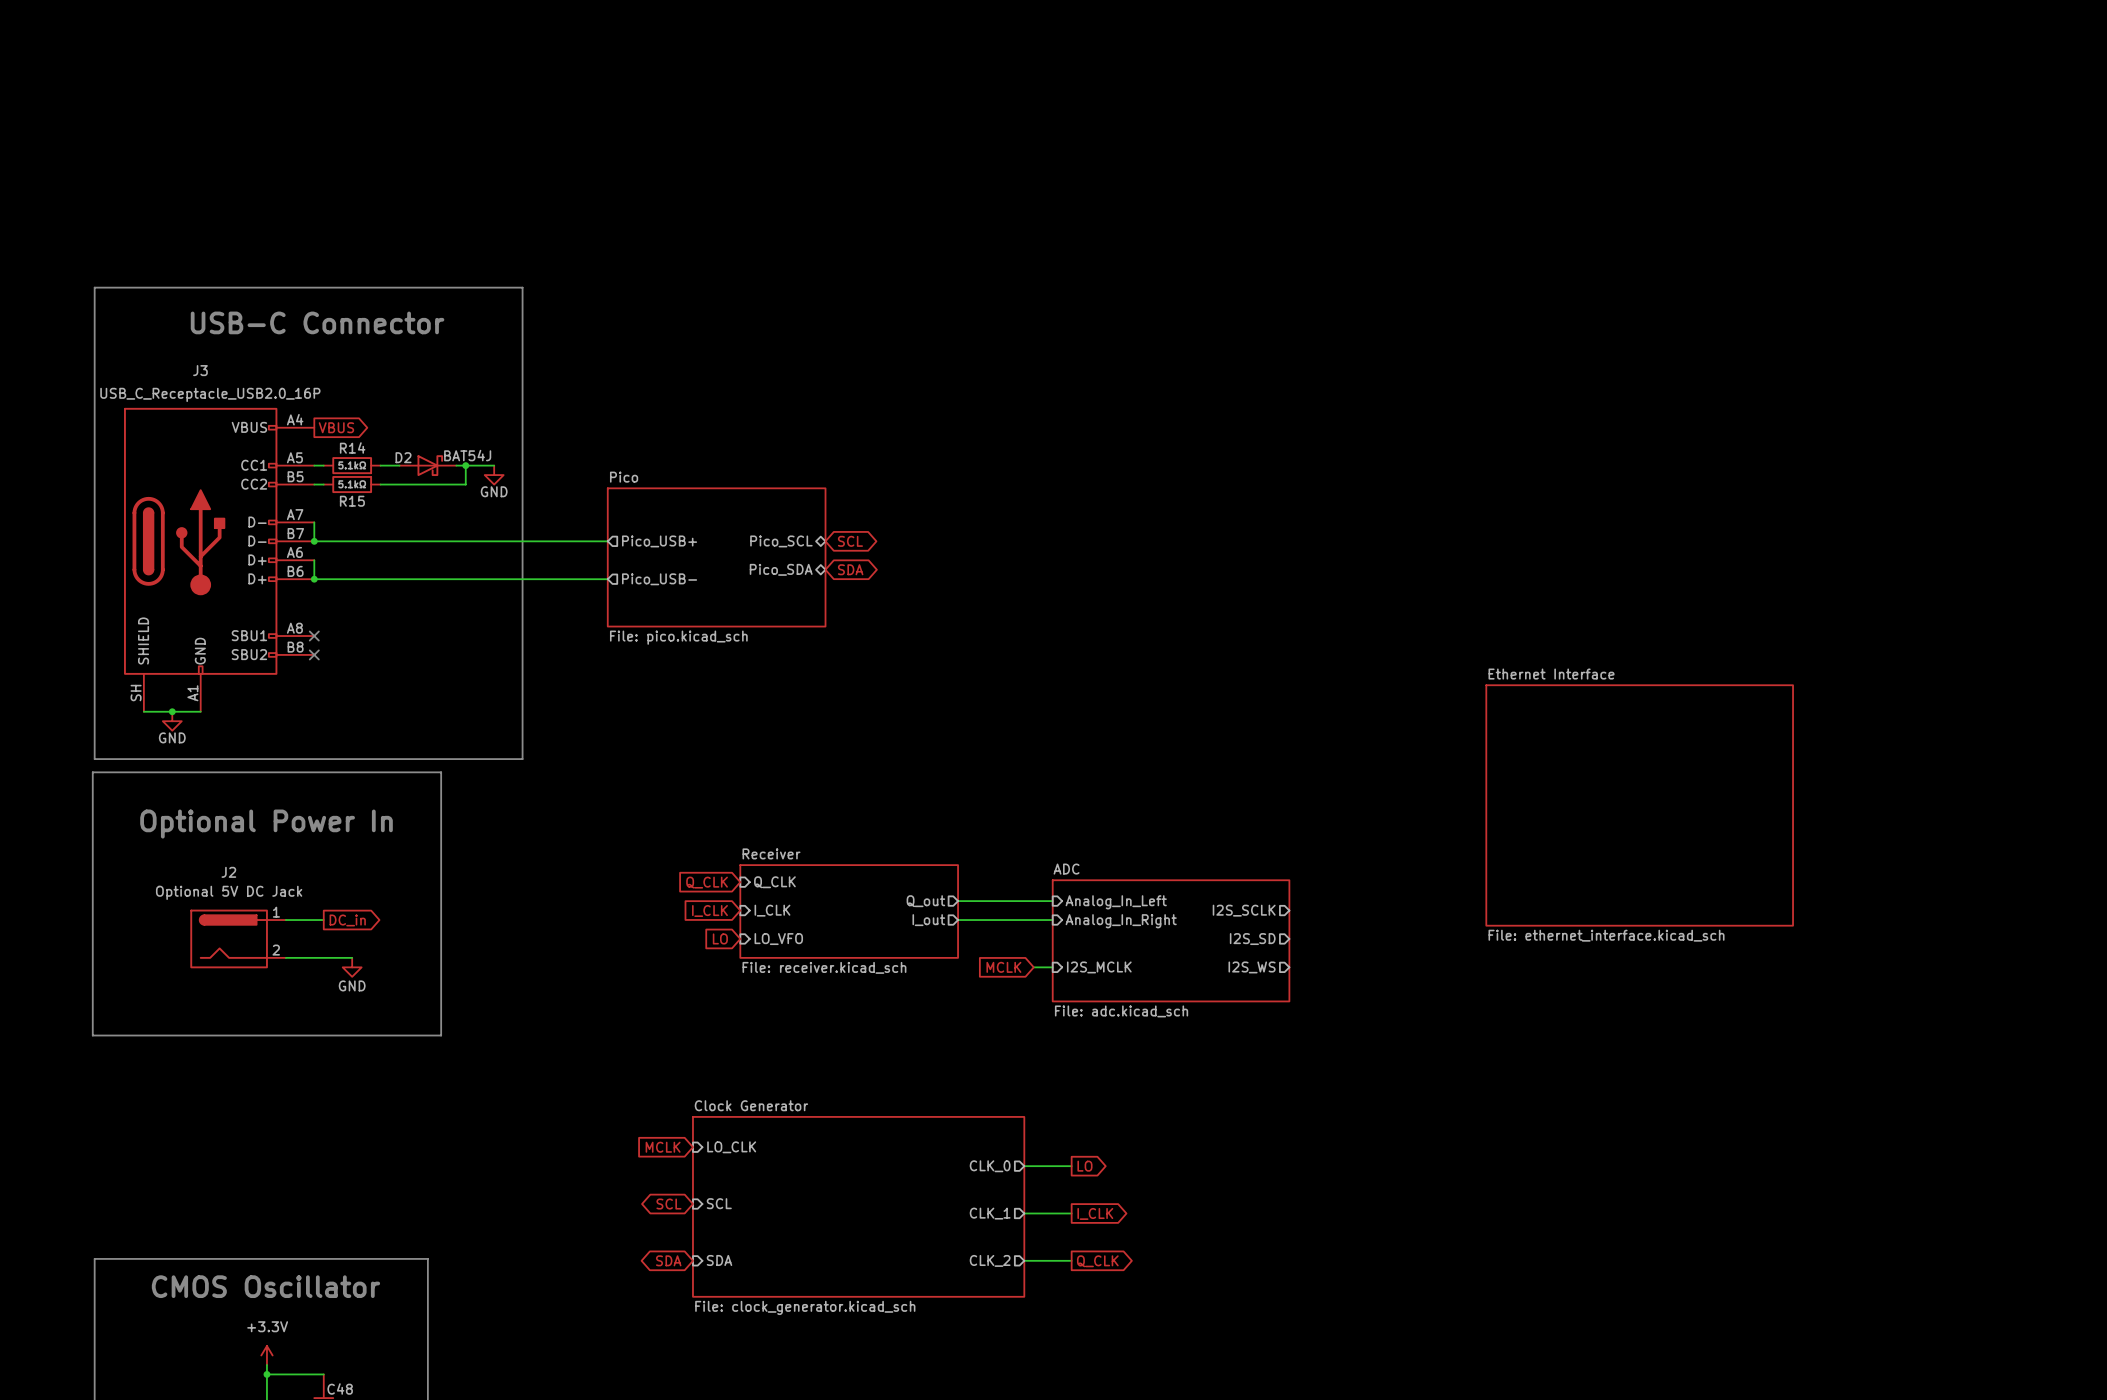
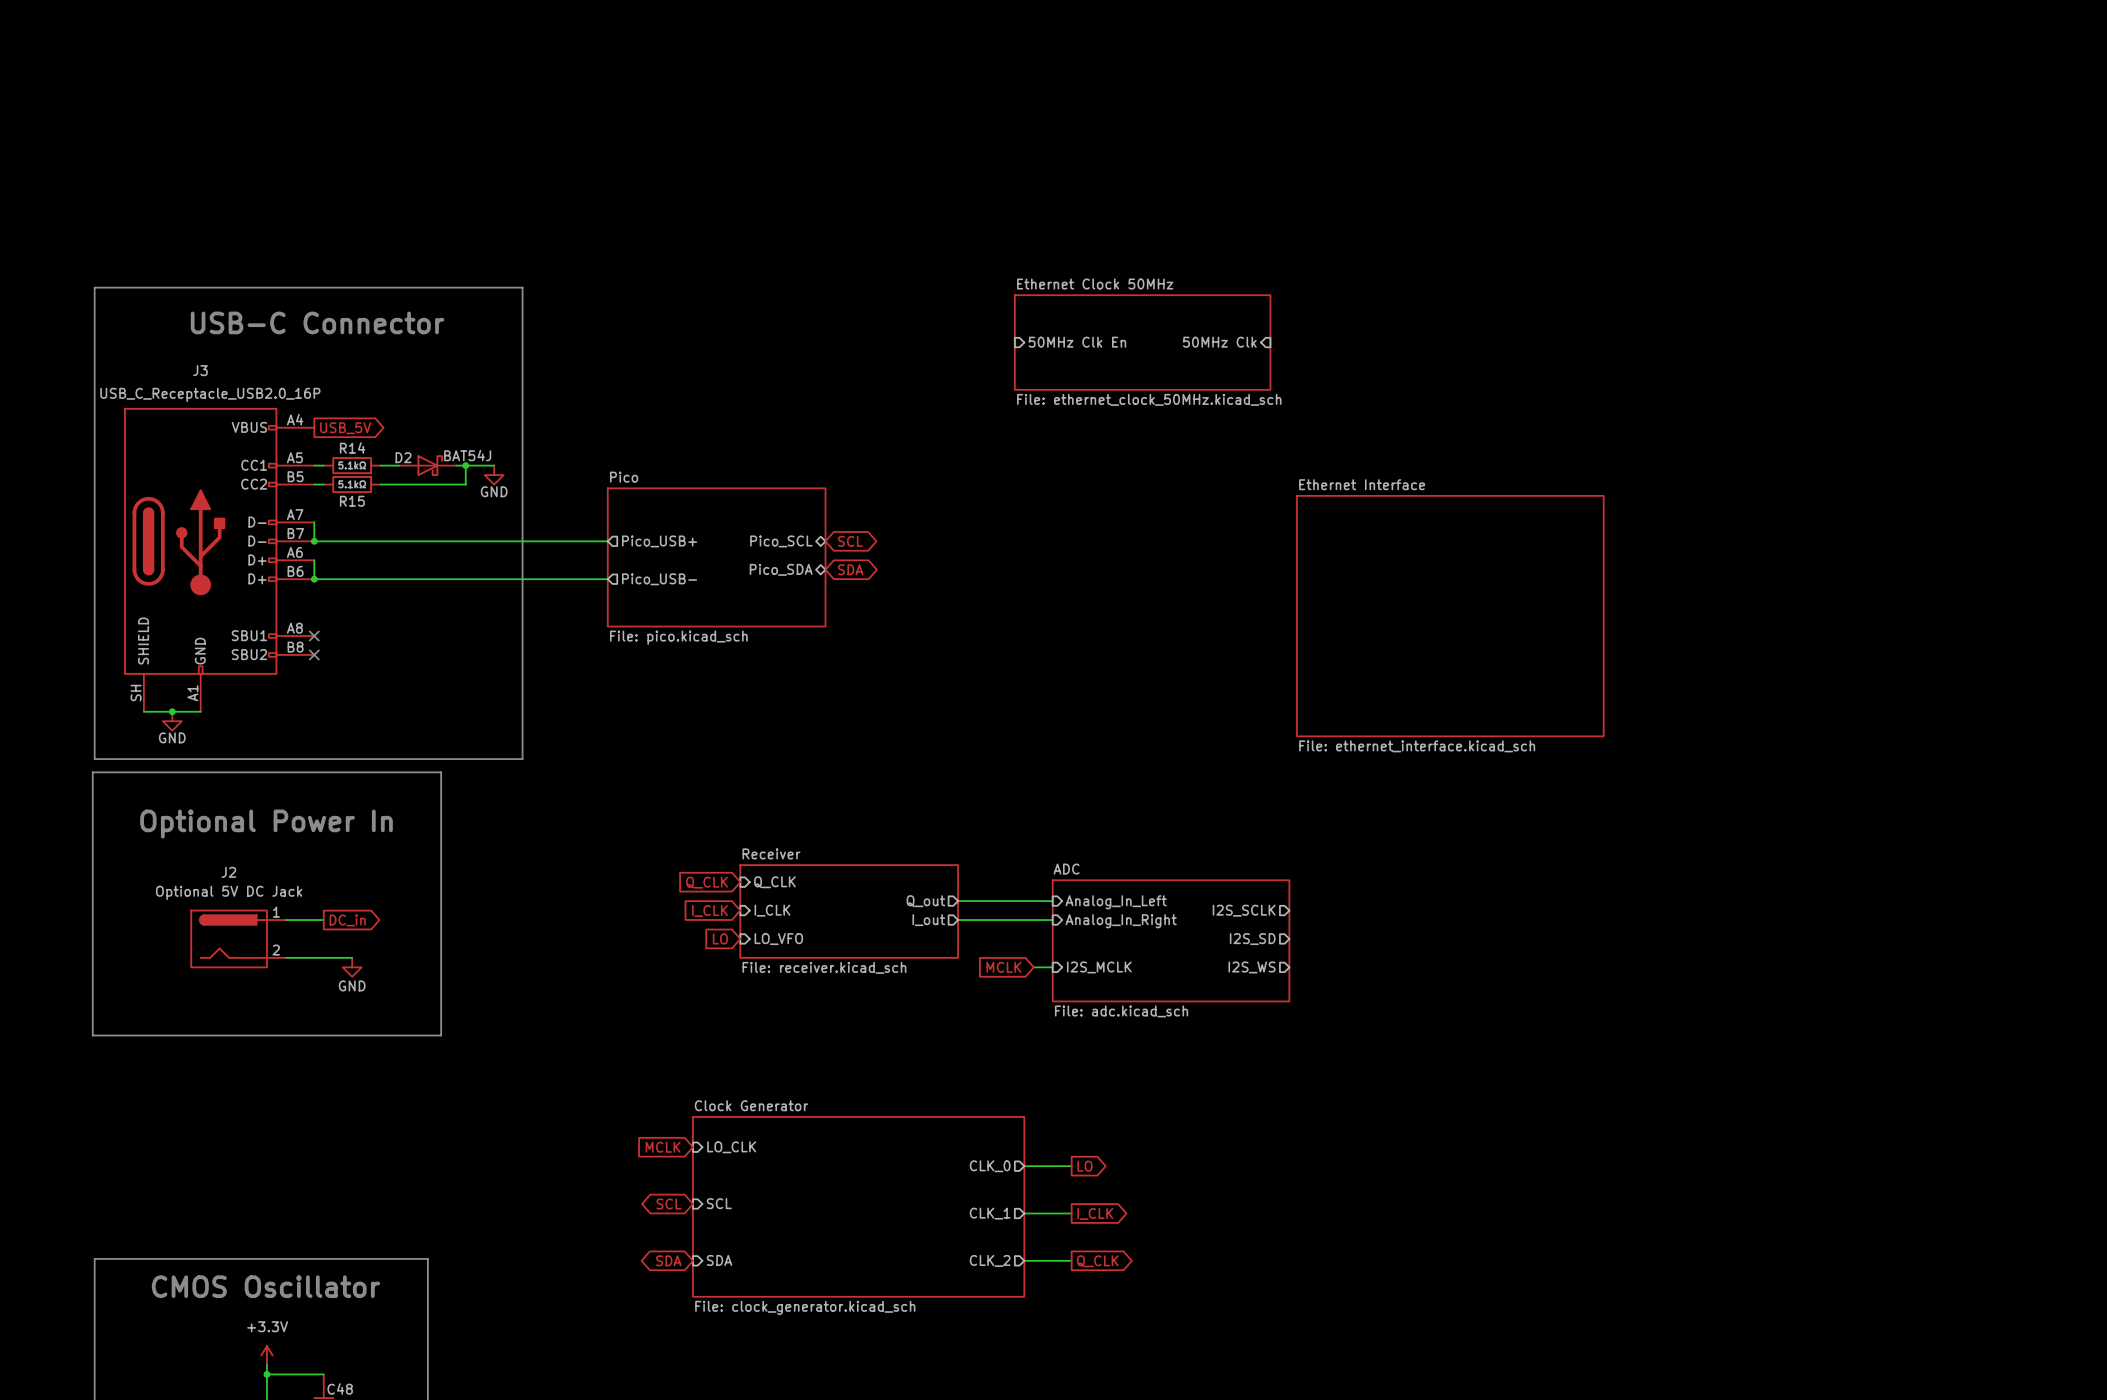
sheet pin: none -> 50MHz Clk En (1077, 342)
sheet Ethernet Clock 50MHz: none -> File: ethernet_clock_50MHz.kicad_sch (1142, 342)
sheet pin: none -> 50MHz Clk (1219, 342)
global label: VBUS (336, 427) -> USB_5V (345, 428)
sheet Ethernet Interface: none -> File: ethernet_interface.kicad_sch (1450, 616)
sheet Ethernet Interface: File: ethernet_interface.kicad_sch (1639, 805) -> none

